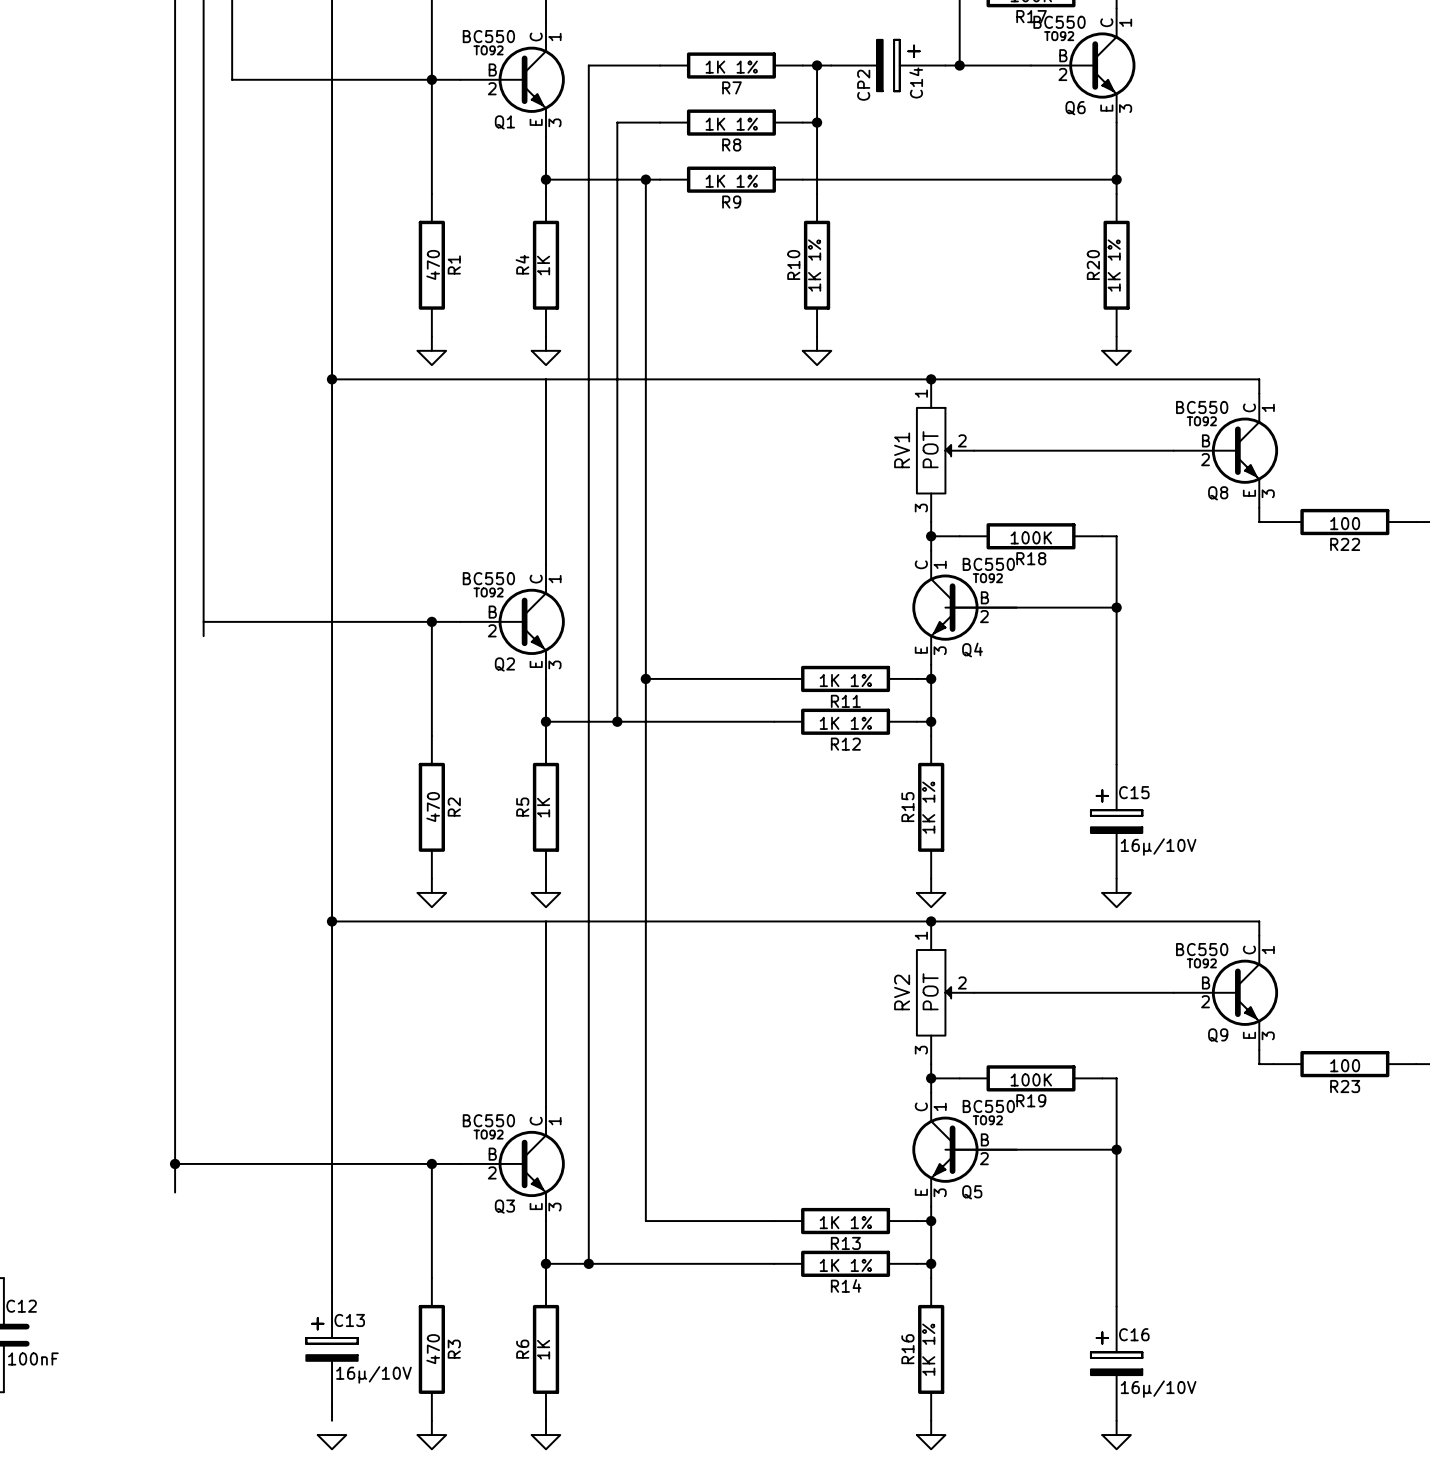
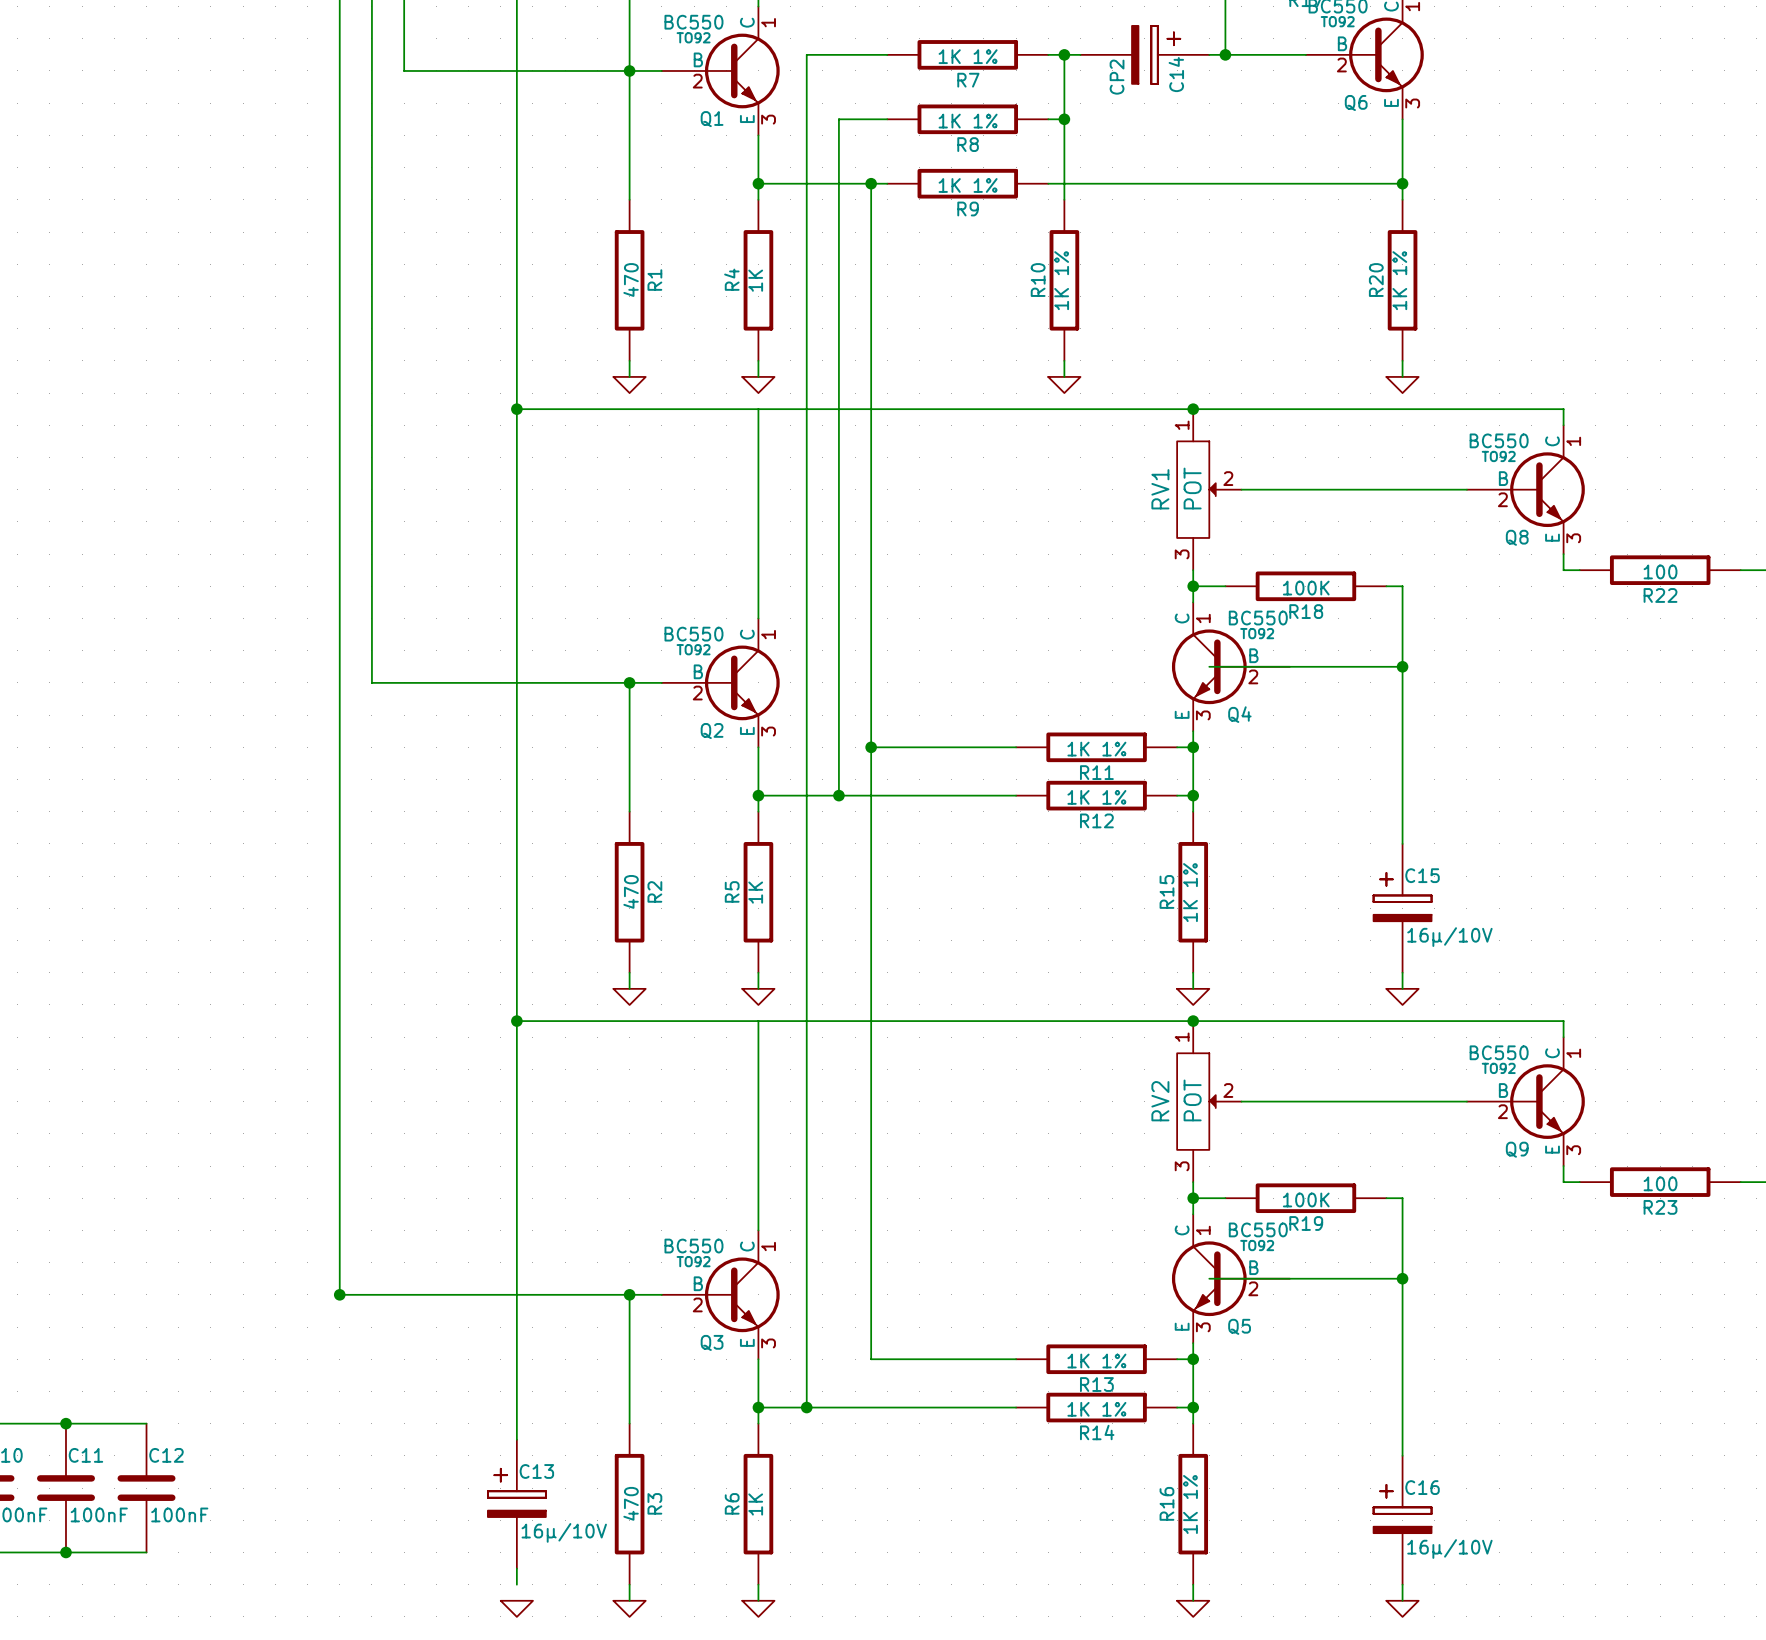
wire: (203, 621) (203, 636) -> none
wire: (175, 1163) (175, 1192) -> none

